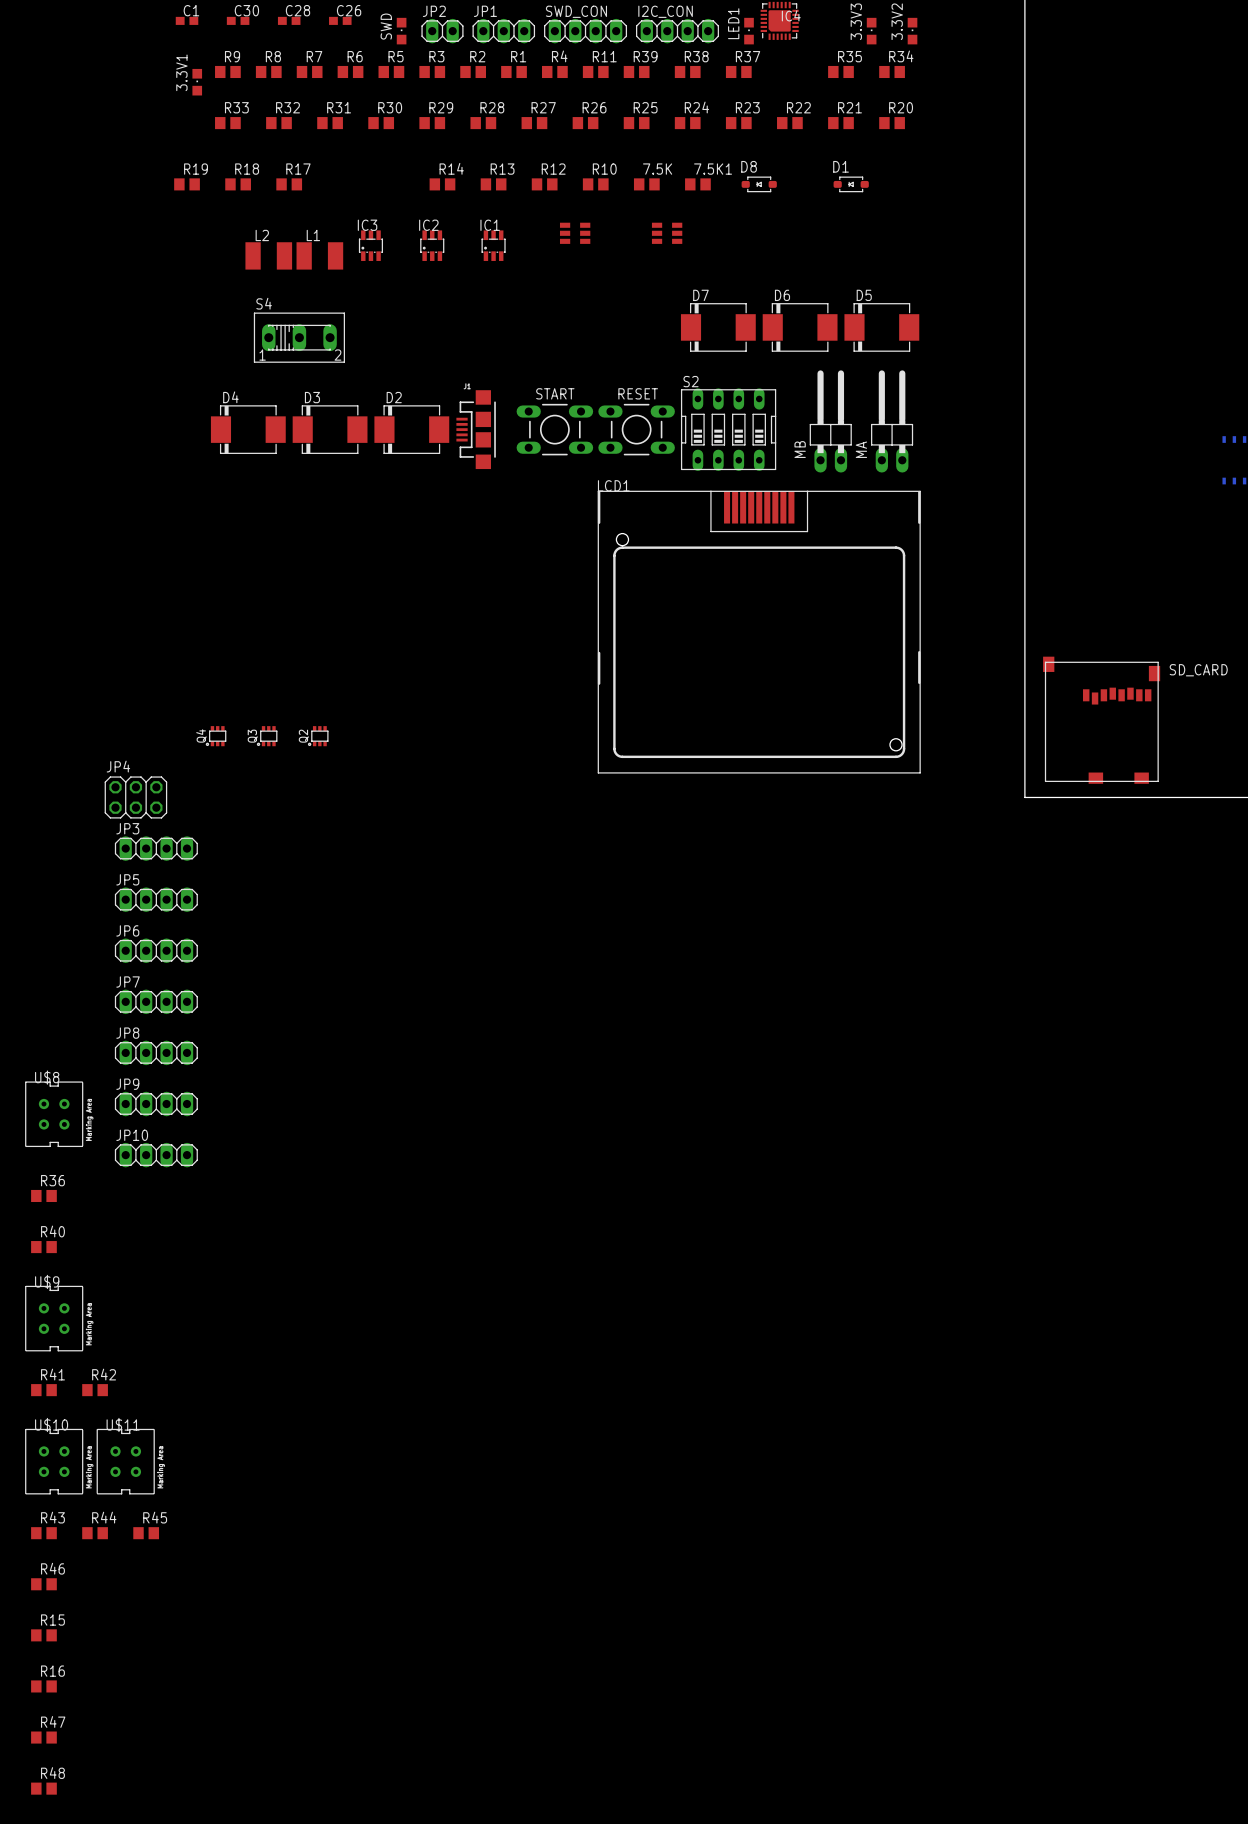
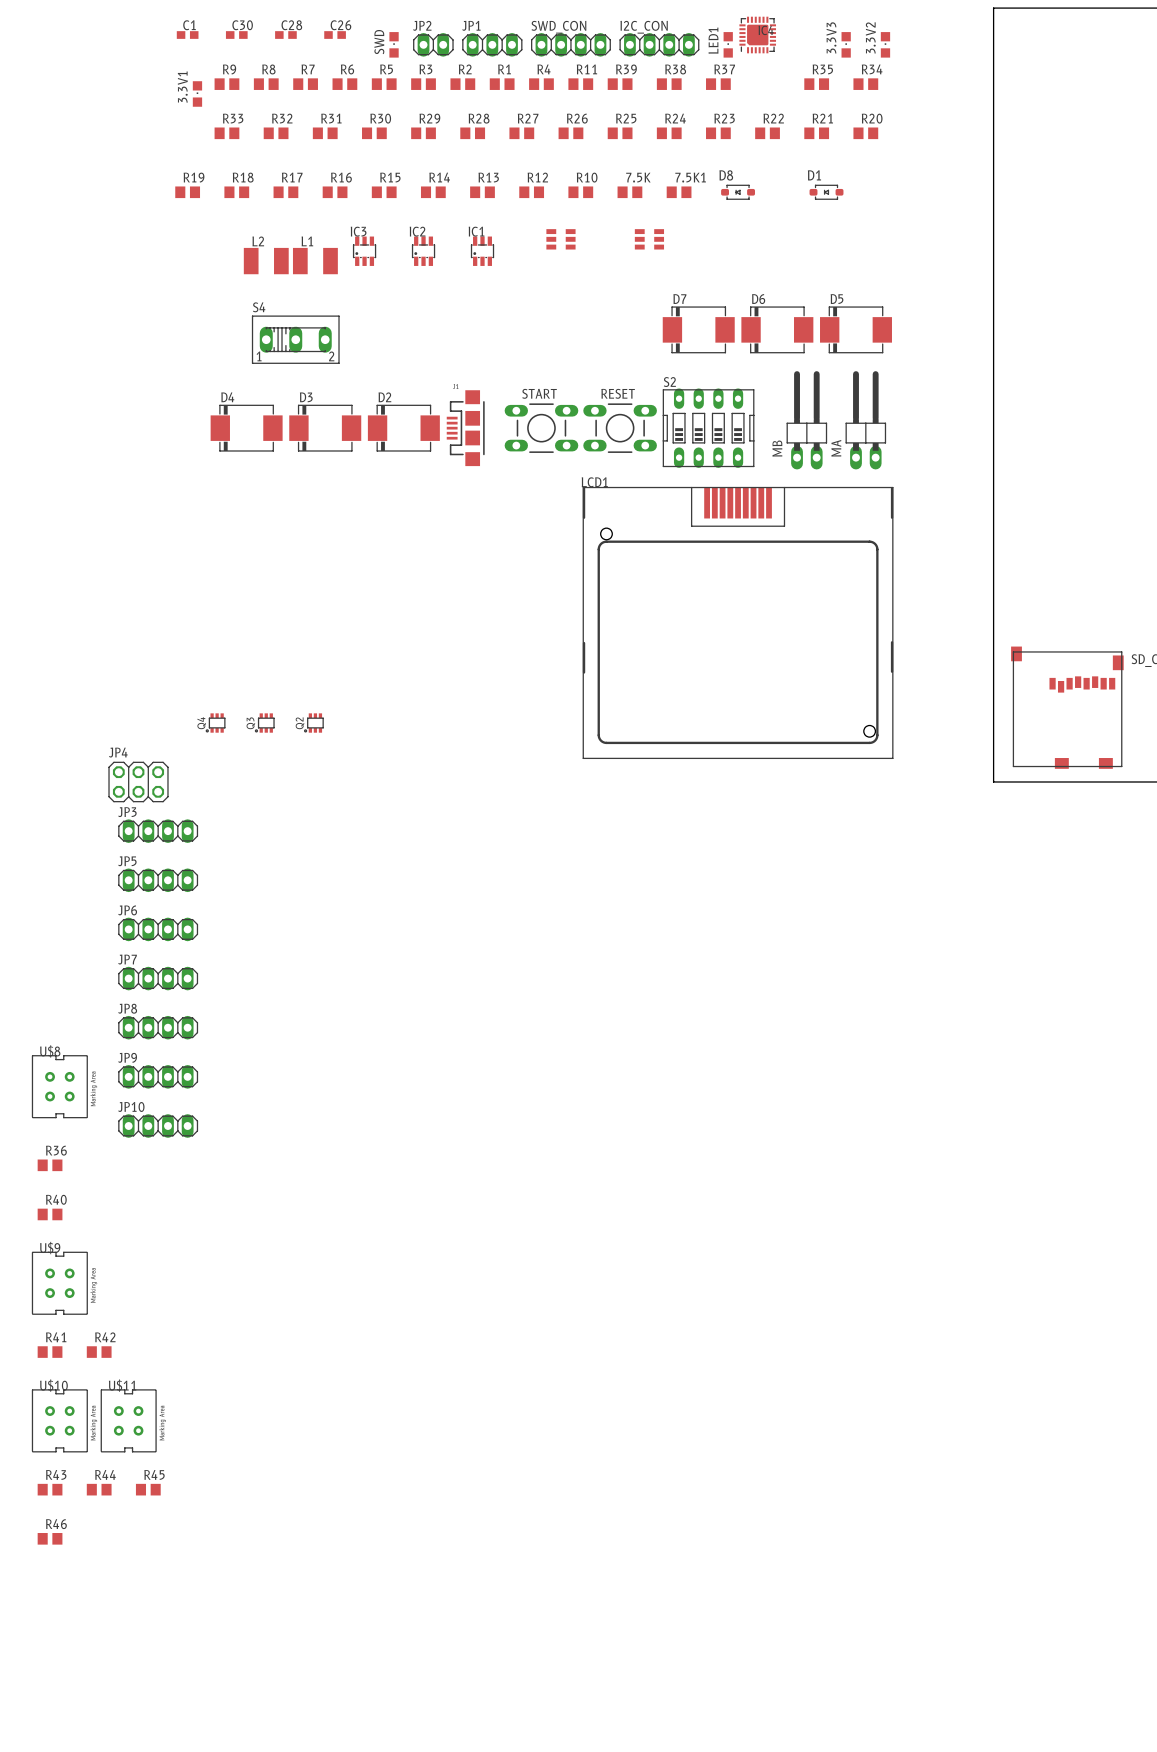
R15 position: (43, 1635) -> (384, 192)
R16 position: (43, 1686) -> (335, 192)
R47: (43, 1737) -> none
R48: (43, 1788) -> none

